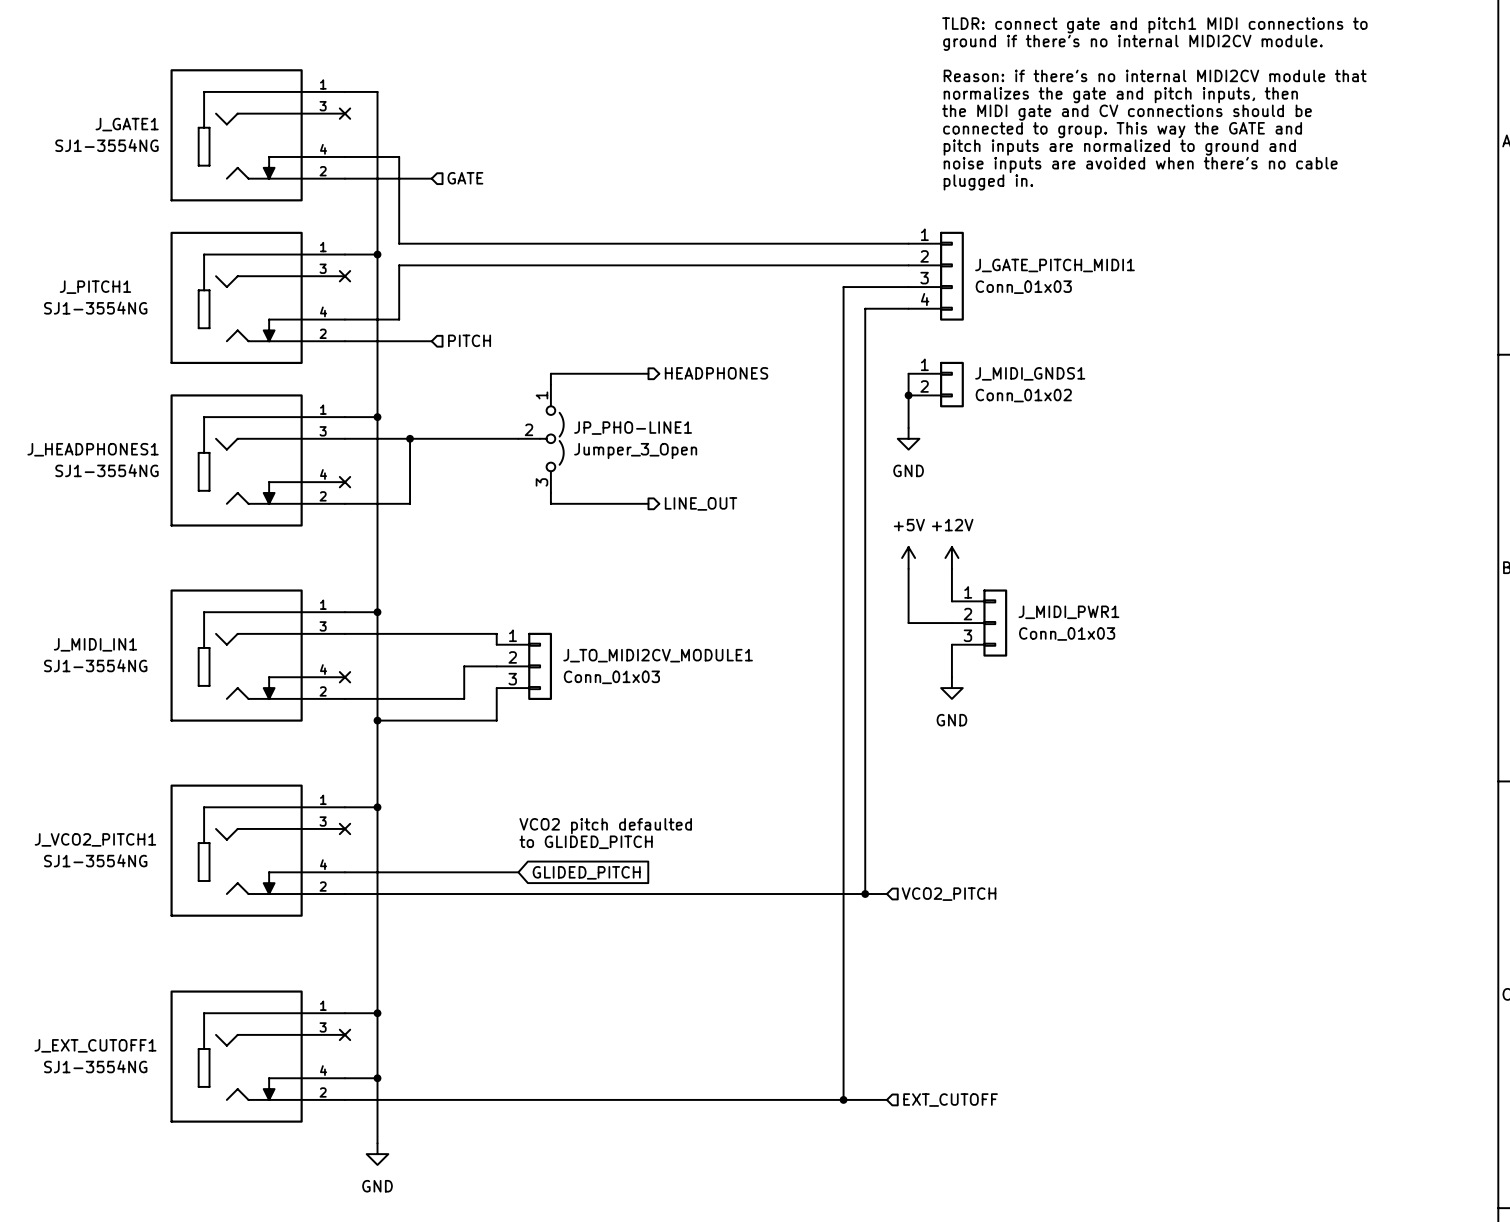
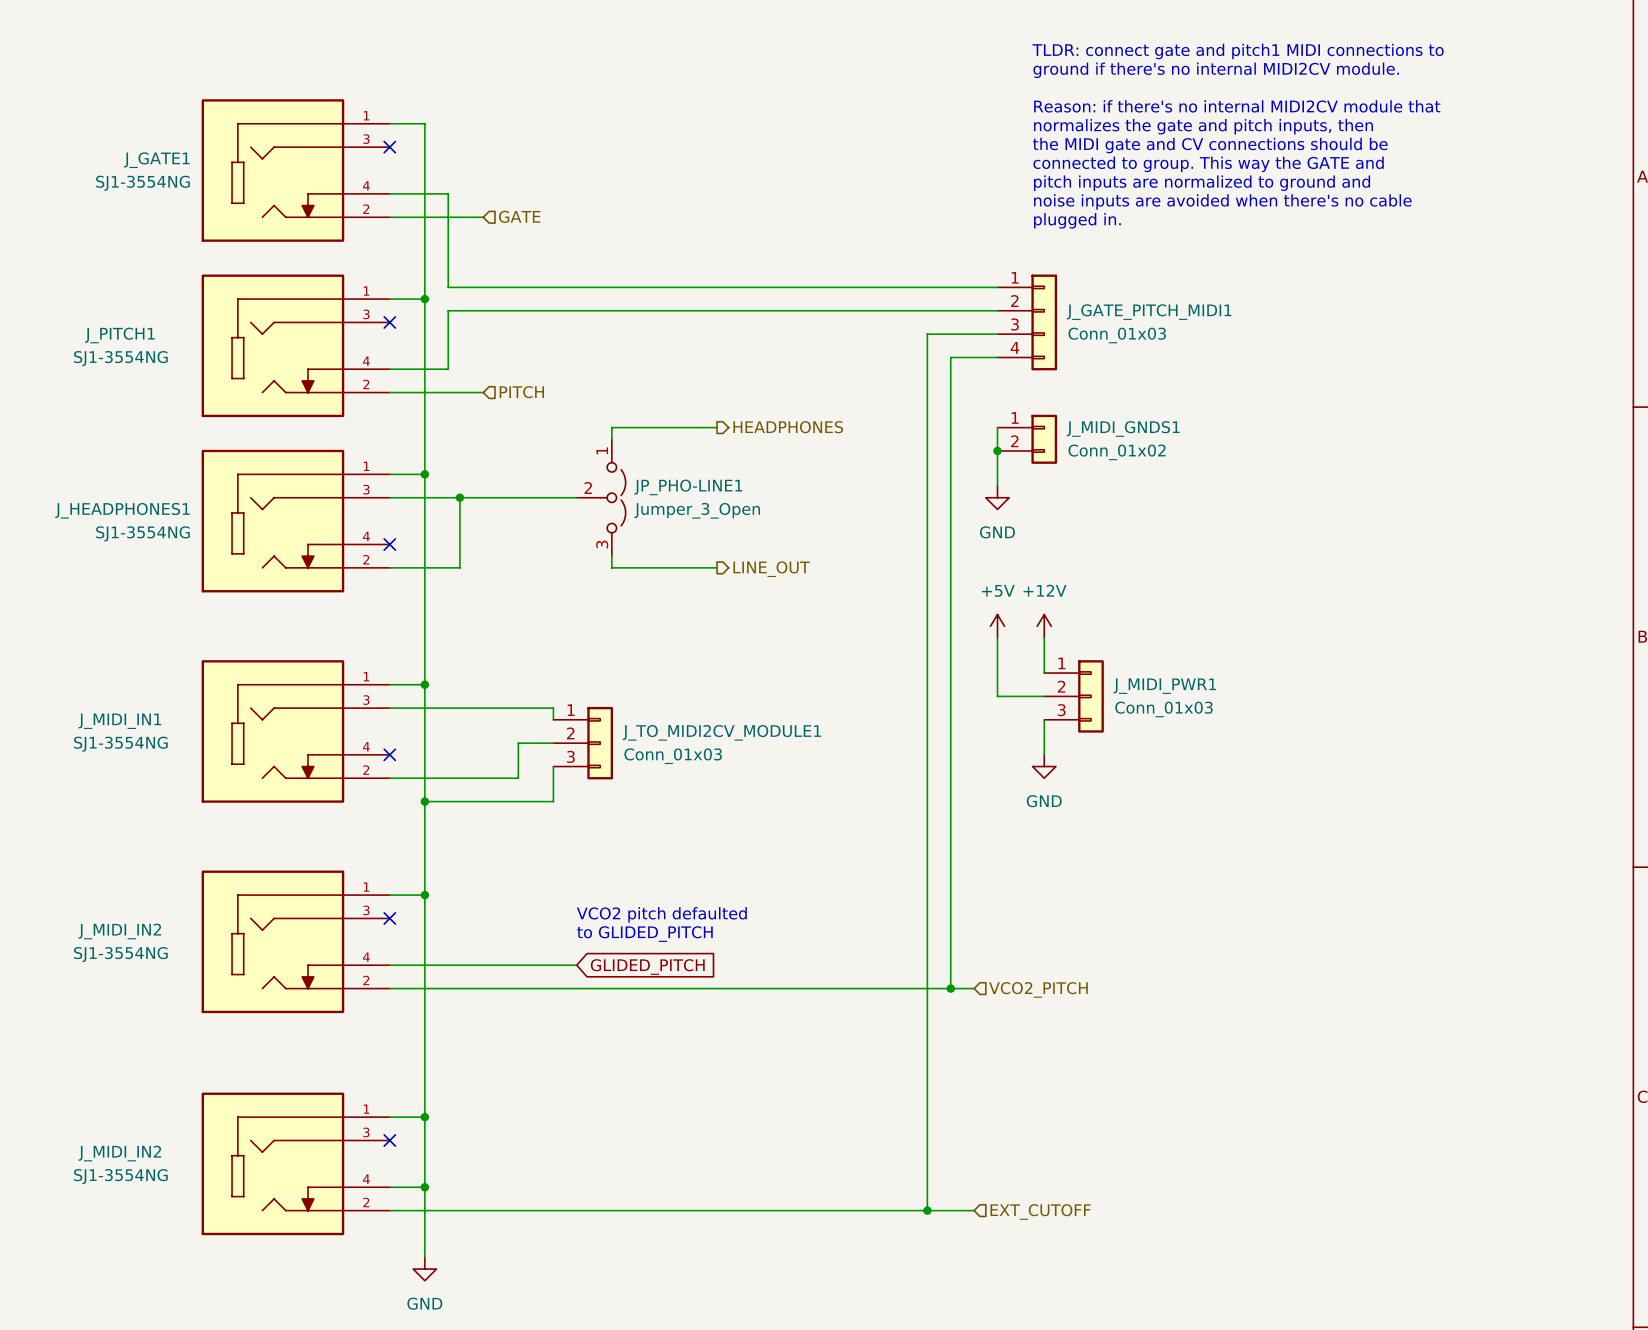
J_VCO2_PITCH1 name: J_VCO2_PITCH1 (95, 839) -> J_MIDI_IN2 (119, 931)
J_EXT_CUTOFF1 name: J_EXT_CUTOFF1 (95, 1045) -> J_MIDI_IN2 (119, 1153)

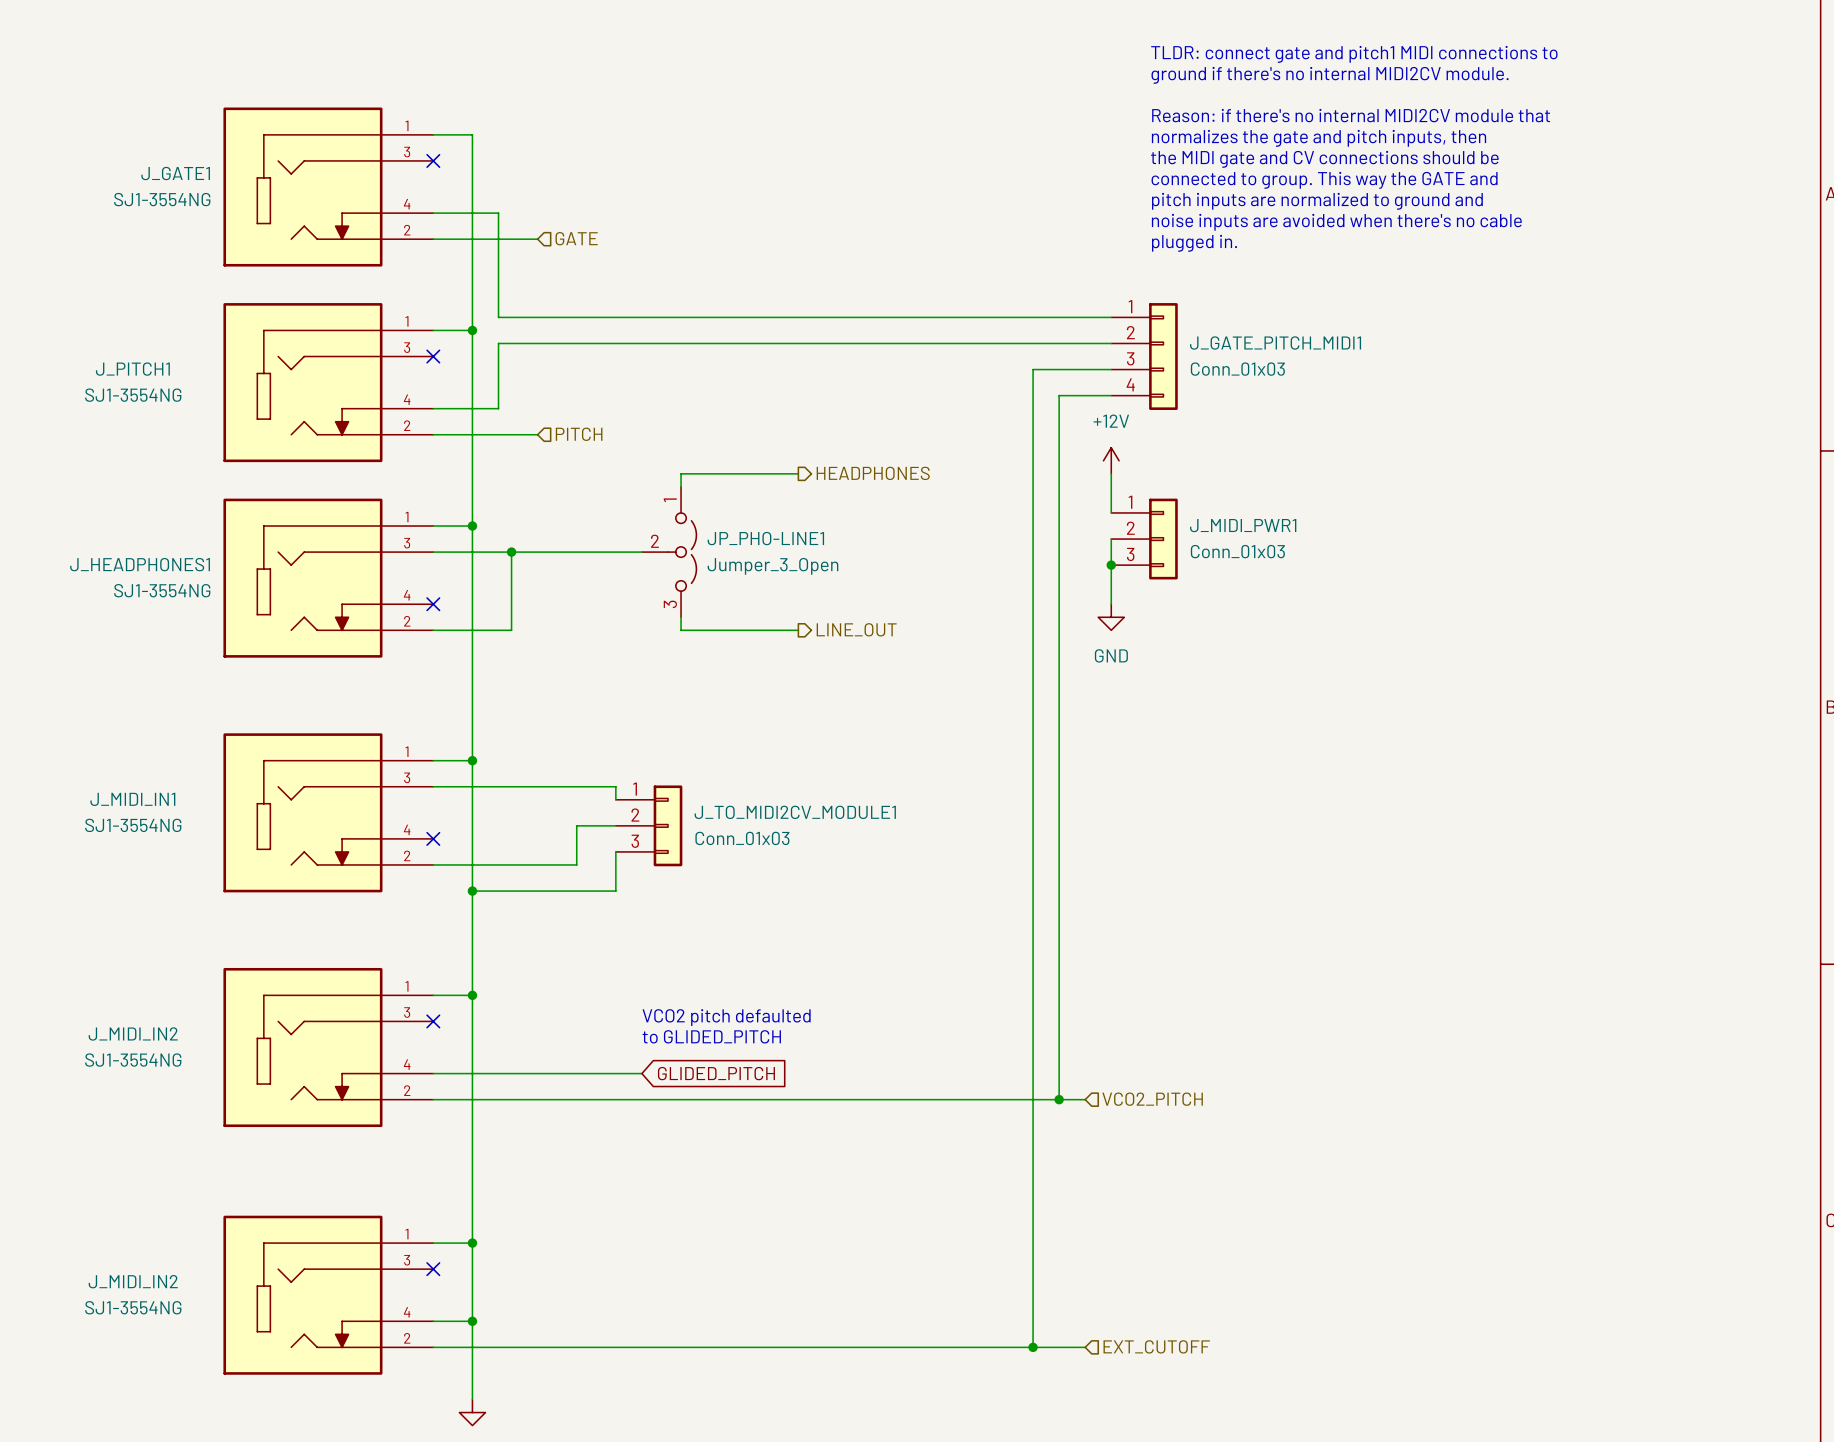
J_MIDI_GNDS1: Conn_01x02 (1027, 439) -> none
junction: (997, 451) -> none
wire: (997, 462) (997, 486) -> (1111, 604) (1111, 539)
power symbol position: GND (997, 497) -> GND (1111, 617)
junction: none -> (1111, 565)
power symbol: +5V (997, 626) -> none
power symbol position: +12V (1044, 626) -> +12V (1111, 460)
wire: (997, 637) (997, 696) (1044, 696) -> none
wire: (1044, 637) (1044, 673) -> none
J_MIDI_PWR1 position: (1074, 696) -> (1144, 539)
wire: (1044, 719) (1044, 754) -> none
power symbol: GND (1044, 766) -> none

